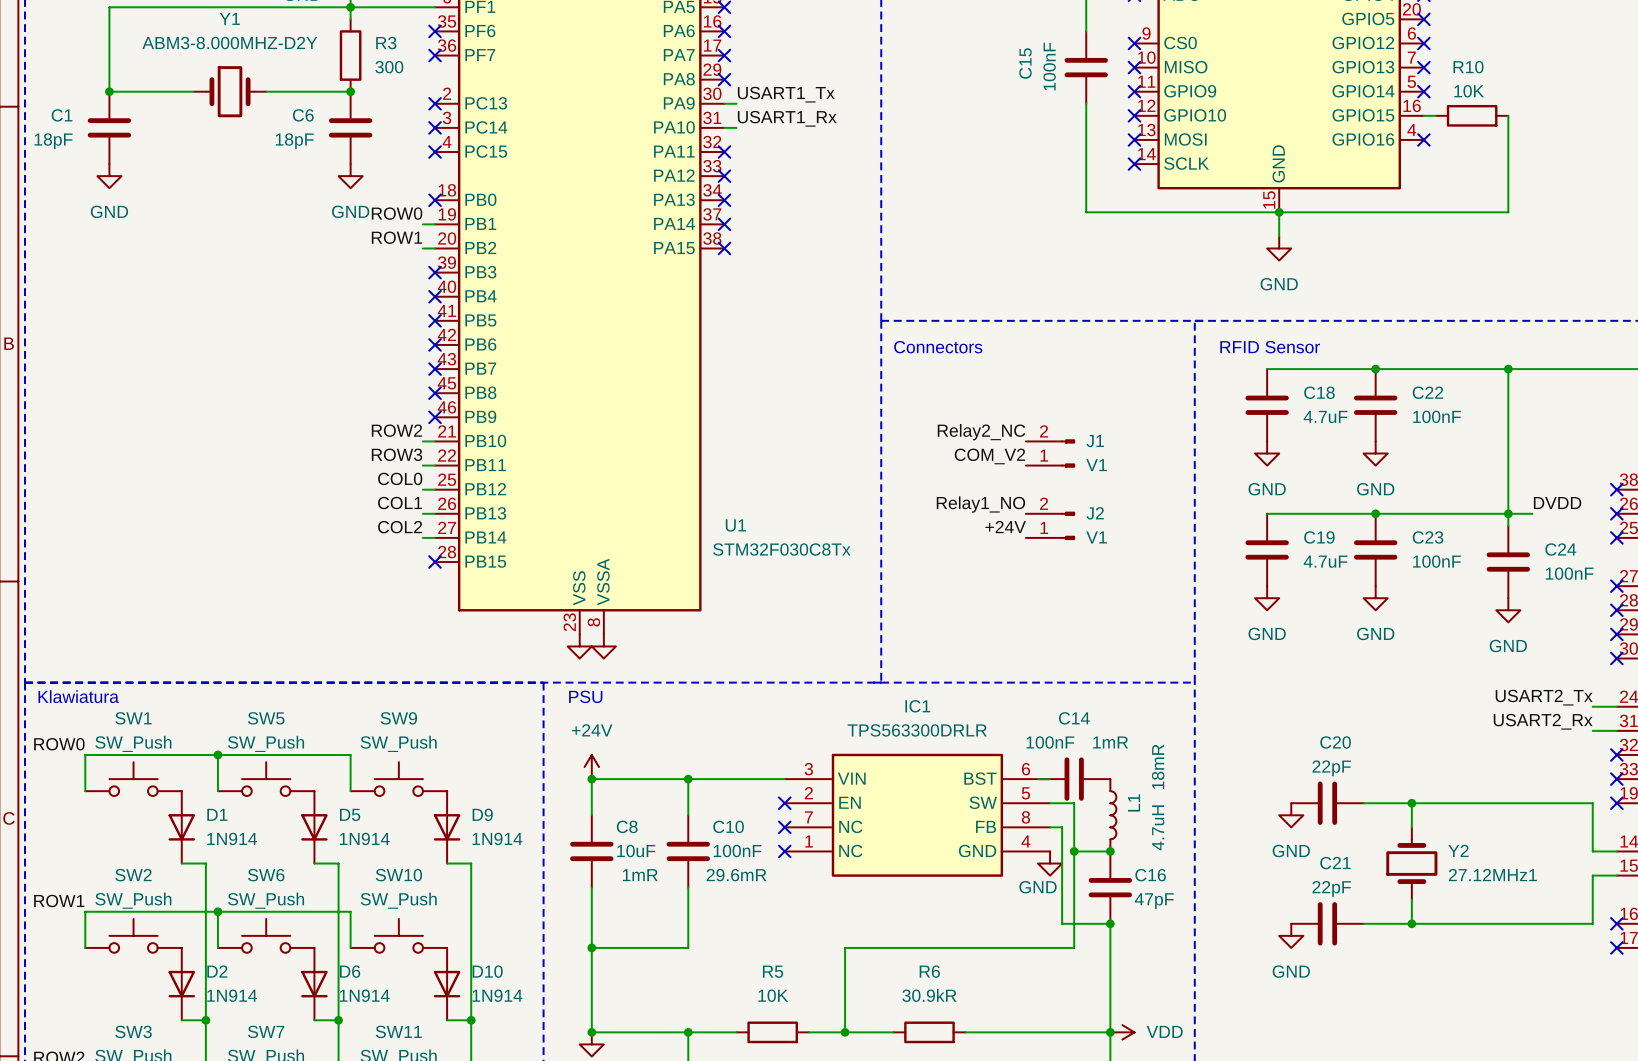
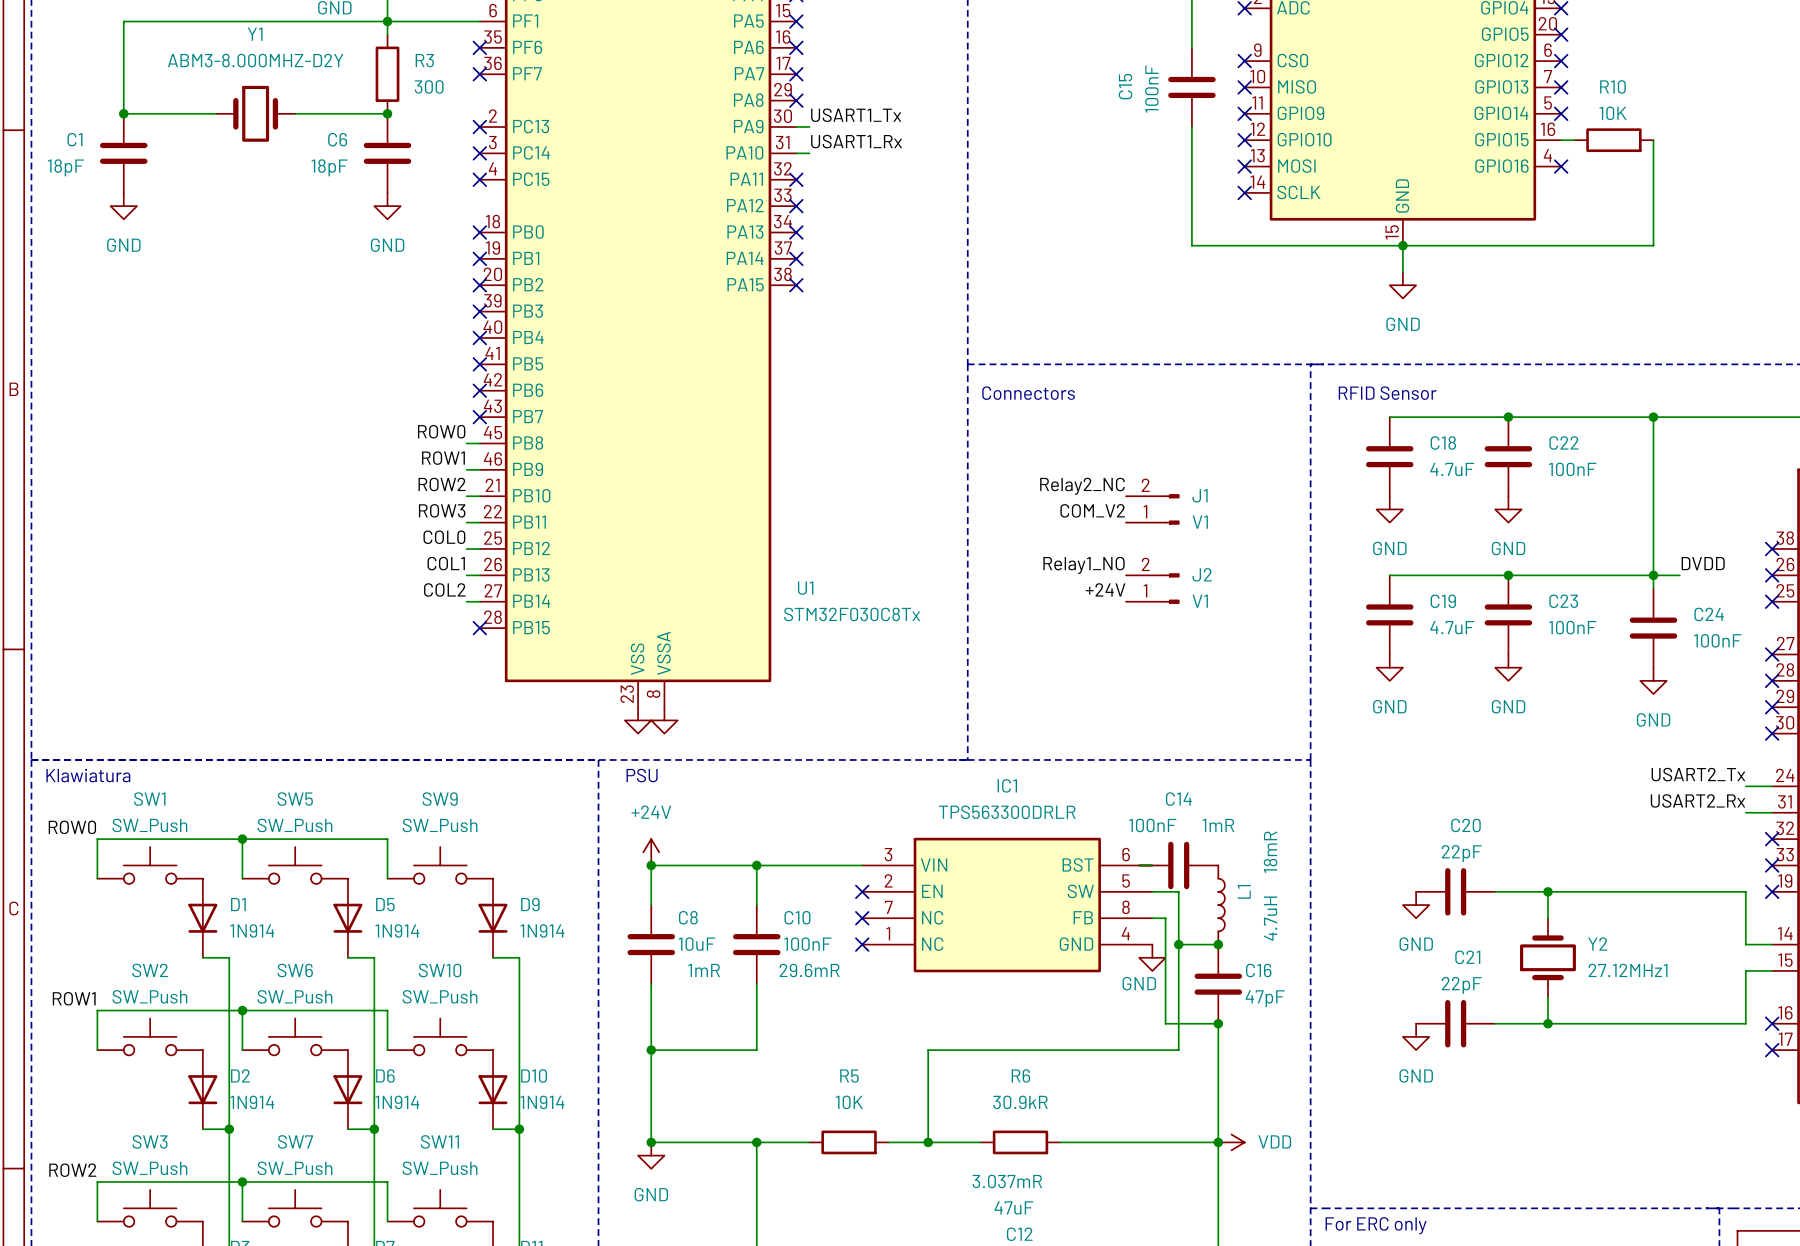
label position: ROW0 (397, 213) -> ROW0 (441, 431)
wire: (422, 224) (435, 224) -> (466, 469) (479, 469)
no-connect mark: none -> (479, 258)
label position: ROW1 (396, 237) -> ROW1 (443, 458)
wire: (422, 248) (435, 248) -> (466, 443) (479, 443)
no-connect mark: none -> (479, 285)
no-connect mark: (435, 393) -> none
no-connect mark: (435, 417) -> none

